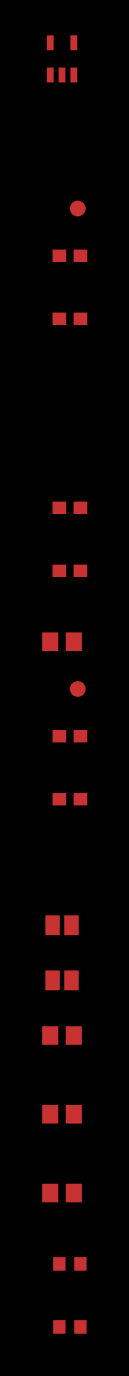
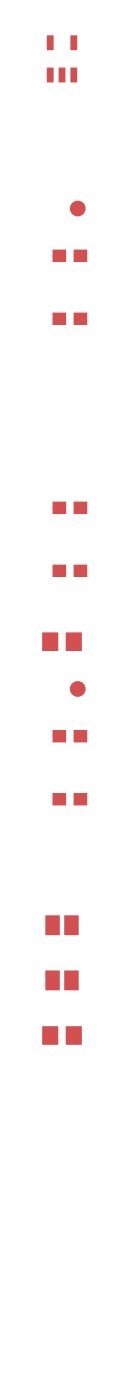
part: (62, 1114) -> none
part: (62, 1193) -> none
part: (69, 1263) -> none
part: (69, 1326) -> none

